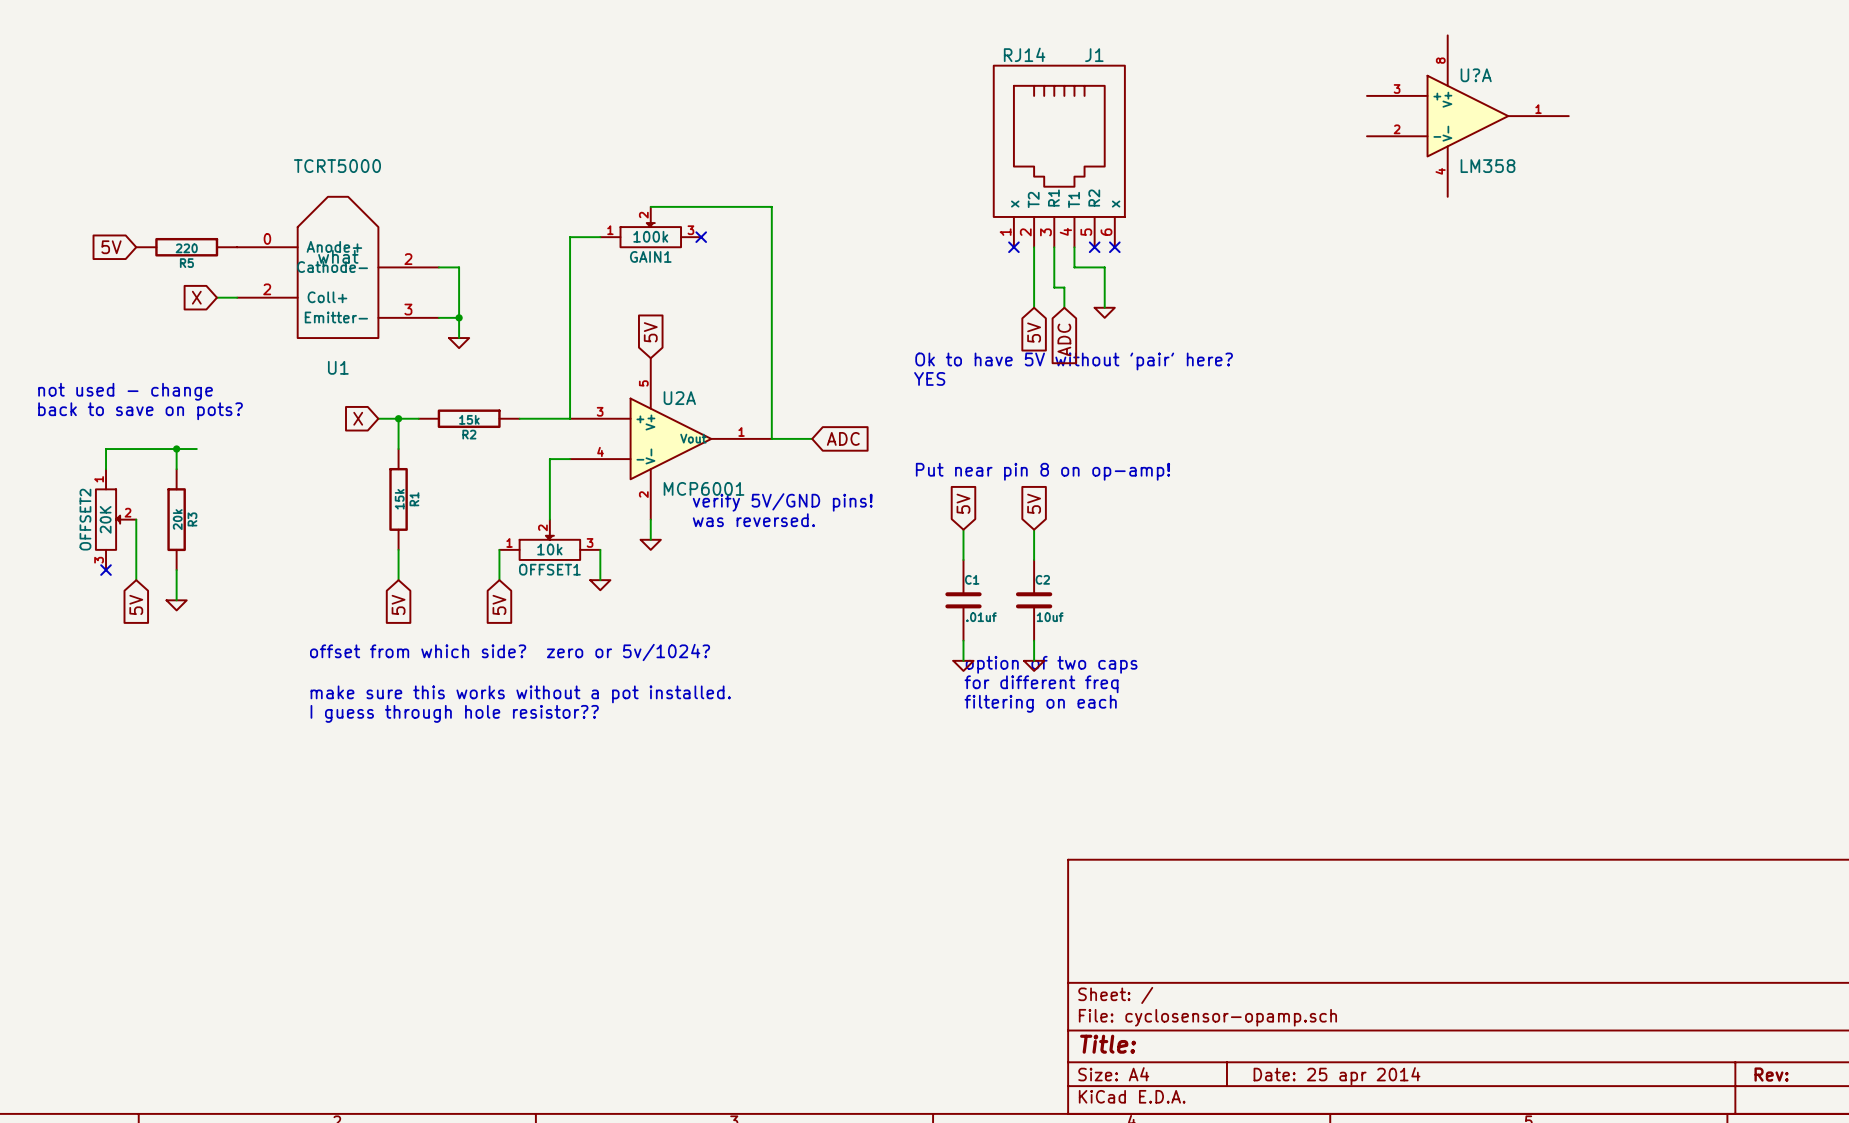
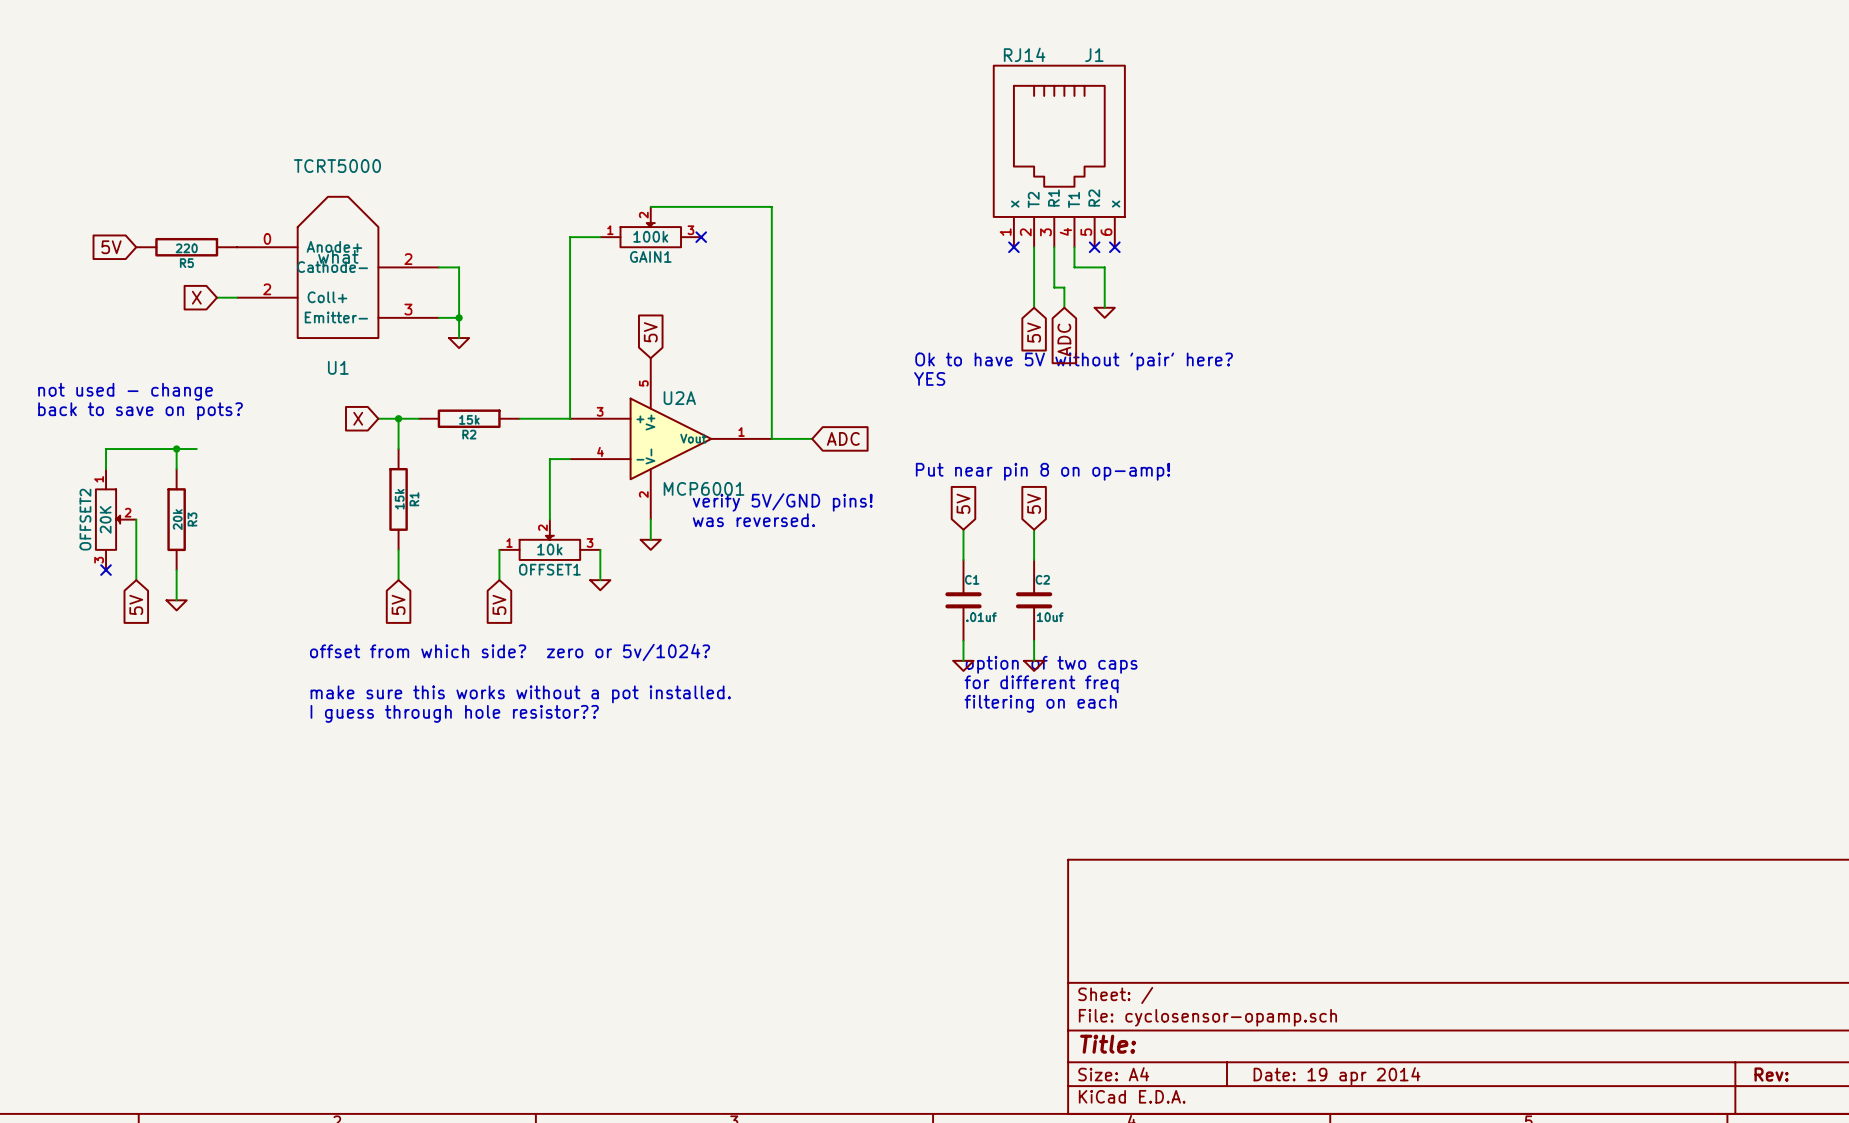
U?A: LM358 (1467, 116) -> none
title block: Date: 25 apr 2014 (1337, 1076) -> Date: 19 apr 2014 (1337, 1076)

